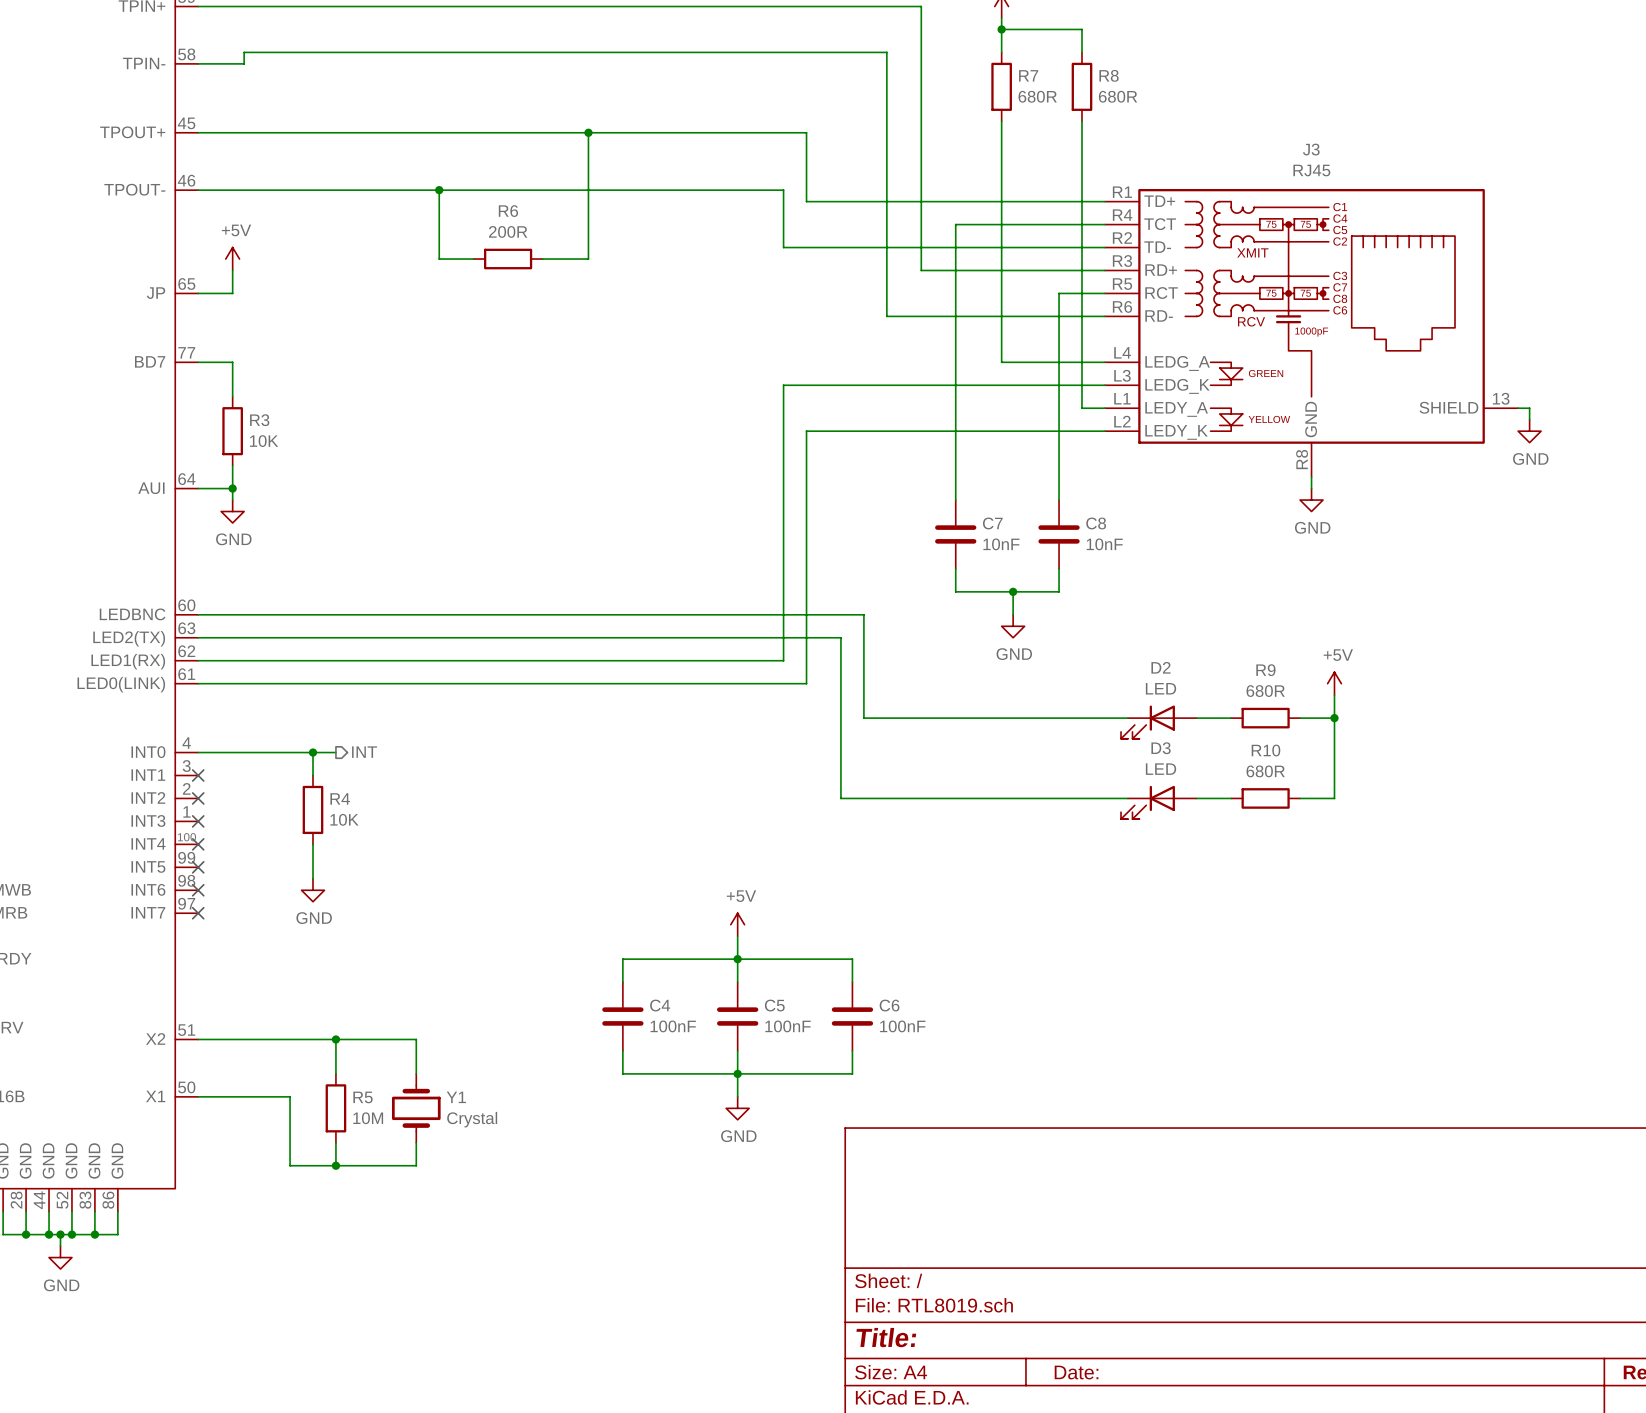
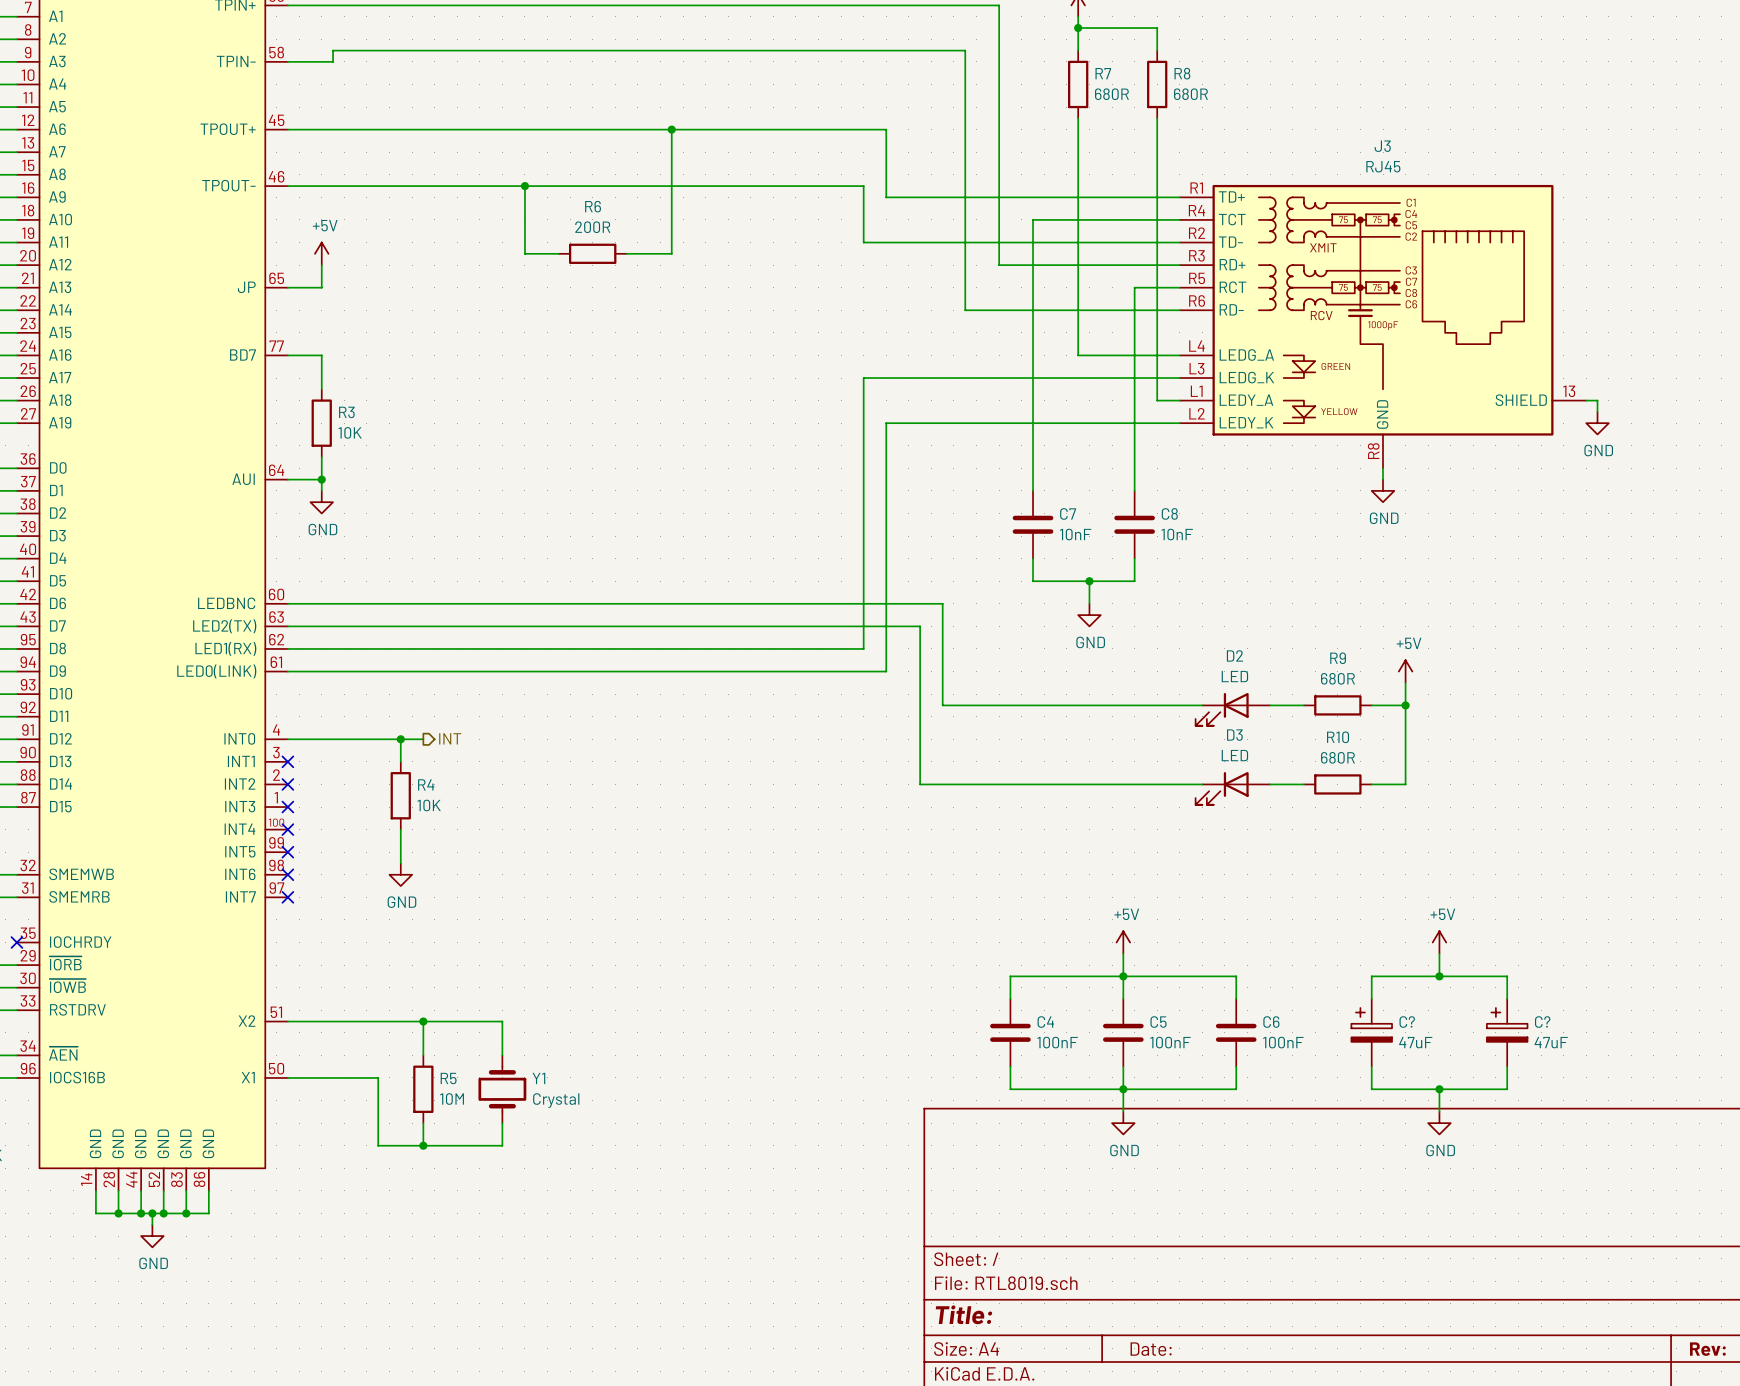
power symbol: +5V (737, 924) -> none
wire: (737, 936) (737, 982) -> none
junction: (737, 959) -> none
power symbol: none -> +5V (1123, 942)
power symbol: none -> +5V (1439, 942)
wire: none -> (1123, 953) (1123, 998)
wire: none -> (1439, 953) (1439, 976)
wire: (622, 982) (622, 959) (852, 959) (852, 982) -> none
junction: none -> (1123, 976)
junction: none -> (1439, 976)
C4 position: (622, 1016) -> (1010, 1032)
C5 position: (737, 1016) -> (1123, 1032)
C6 position: (852, 1016) -> (1236, 1032)
wire: none -> (1010, 998) (1010, 976) (1236, 976) (1236, 998)
wire: none -> (1371, 998) (1371, 976) (1507, 976) (1507, 998)
wire: (622, 1050) (622, 1073) (852, 1073) (852, 1050) -> none
wire: (737, 1050) (737, 1096) -> none
C?: none -> 47uF (1371, 1032)
C?: none -> 47uF (1507, 1032)
junction: (737, 1073) -> none
wire: none -> (1010, 1066) (1010, 1089) (1236, 1089) (1236, 1066)
wire: none -> (1123, 1066) (1123, 1111)
wire: none -> (1371, 1066) (1371, 1089) (1507, 1089) (1507, 1066)
power symbol: GND (737, 1108) -> none
junction: none -> (1123, 1089)
wire: none -> (1439, 1089) (1439, 1111)
junction: none -> (1439, 1089)
power symbol: none -> GND (1123, 1123)
power symbol: none -> GND (1439, 1123)

